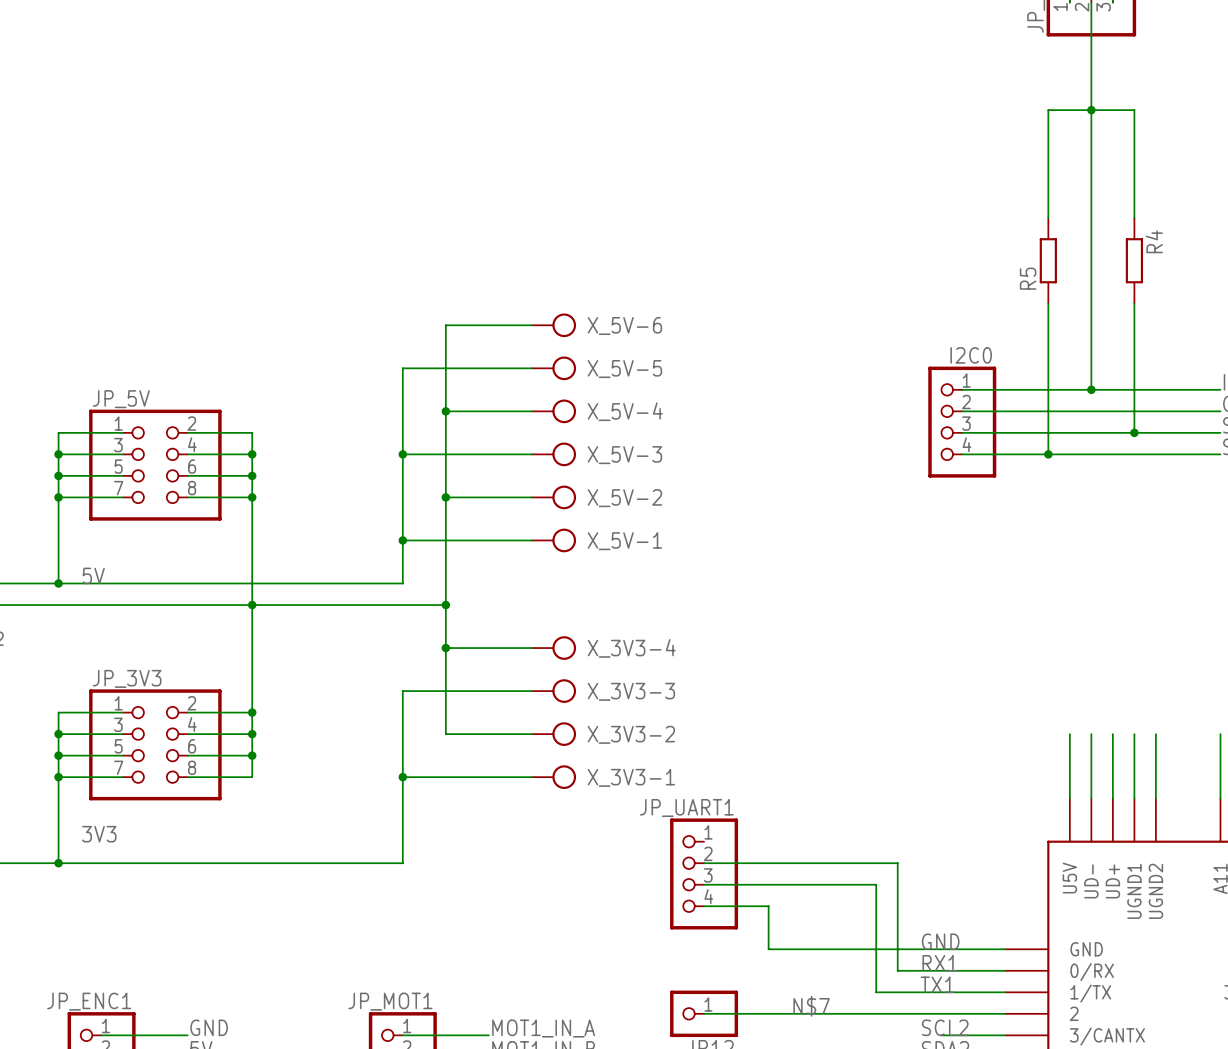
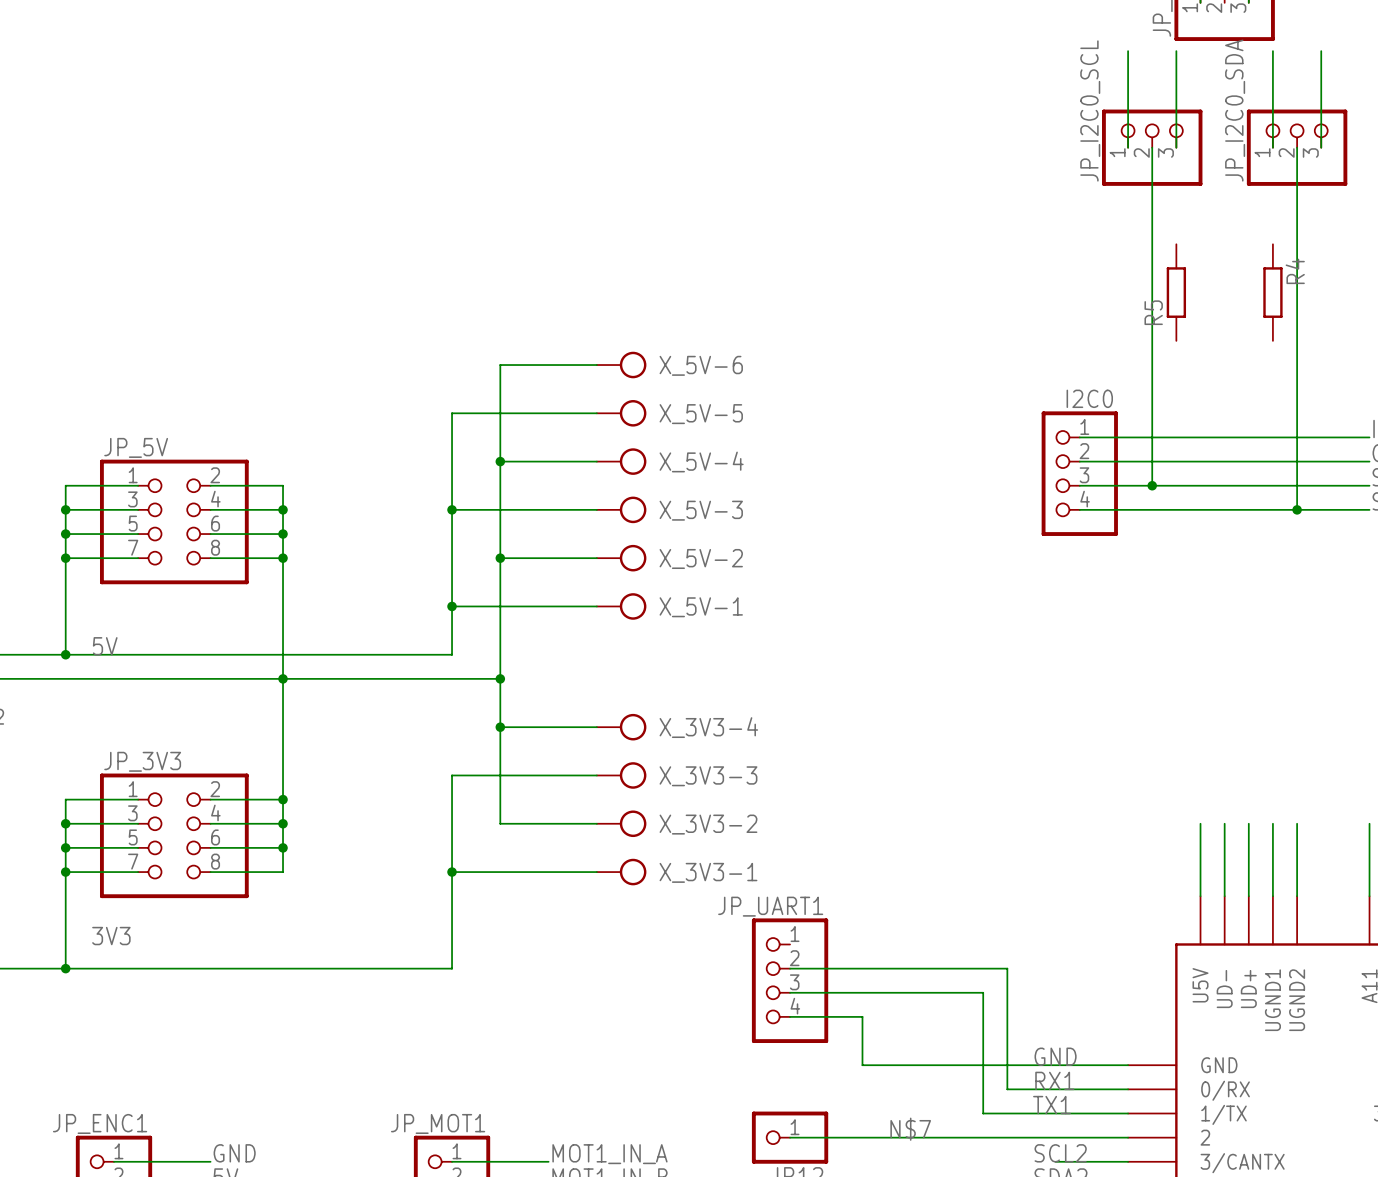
wire: (1091, 2) (1091, 389) -> none
wire: none -> (1272, 51) (1272, 123)
wire: (1048, 110) (1134, 110) -> (1176, 123) (1176, 51)
junction: (1091, 110) -> none
wire: none -> (1152, 147) (1152, 485)
JP_I2C0_SCL: none -> (1152, 147)
wire: (1048, 131) (1048, 217) -> (1128, 51) (1128, 147)
wire: (1134, 131) (1134, 217) -> (1321, 51) (1321, 147)
wire: none -> (1297, 147) (1297, 509)
JP_I2C0_SDA: none -> (1297, 147)
wire: (1048, 303) (1048, 454) -> none
wire: (1134, 303) (1134, 432) -> none
junction: (1091, 389) -> none
junction position: (1134, 432) -> (1297, 509)
junction position: (1048, 454) -> (1152, 485)

